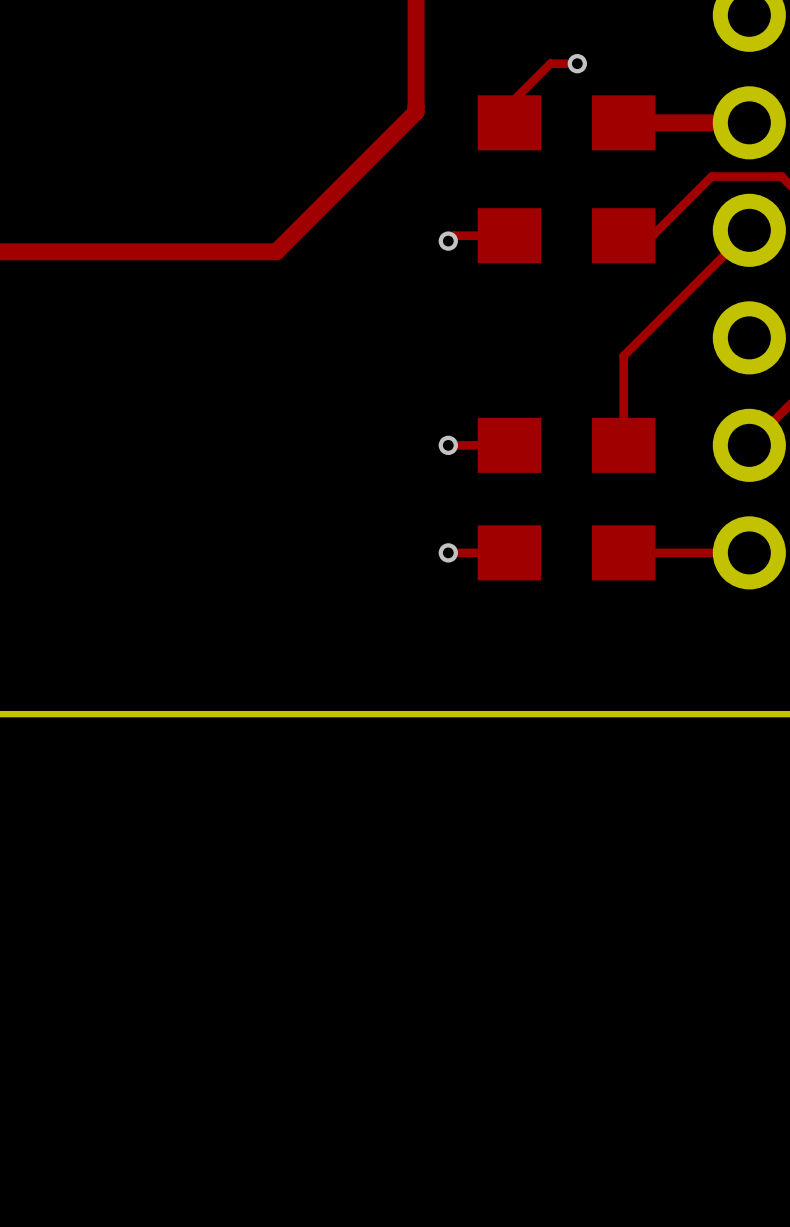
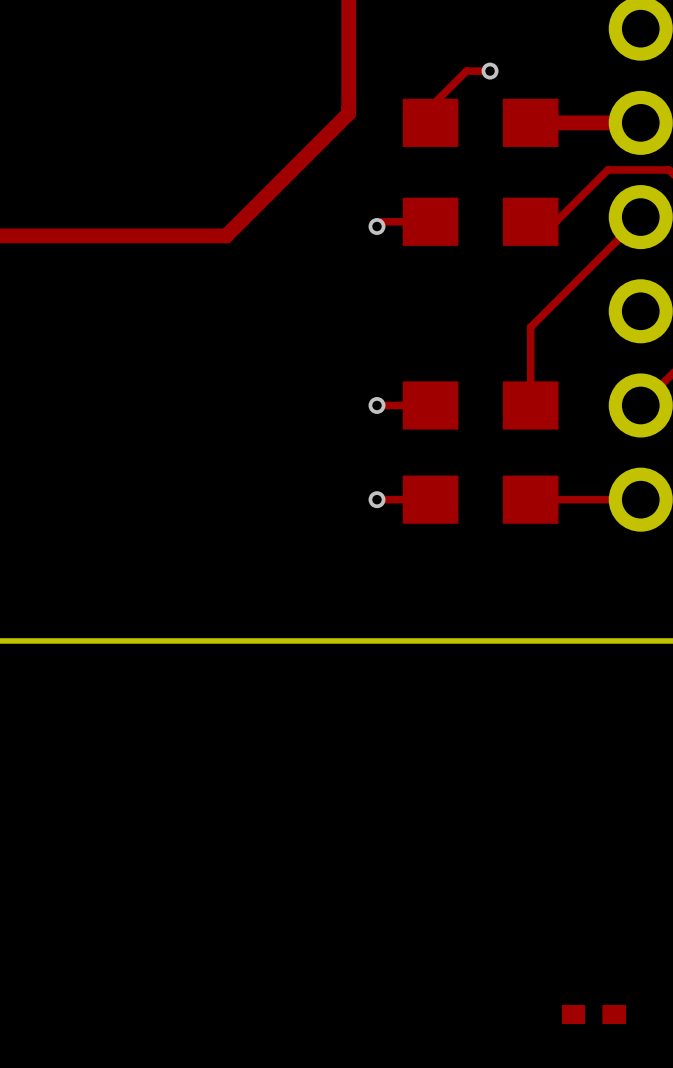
part: none -> (593, 1014)

